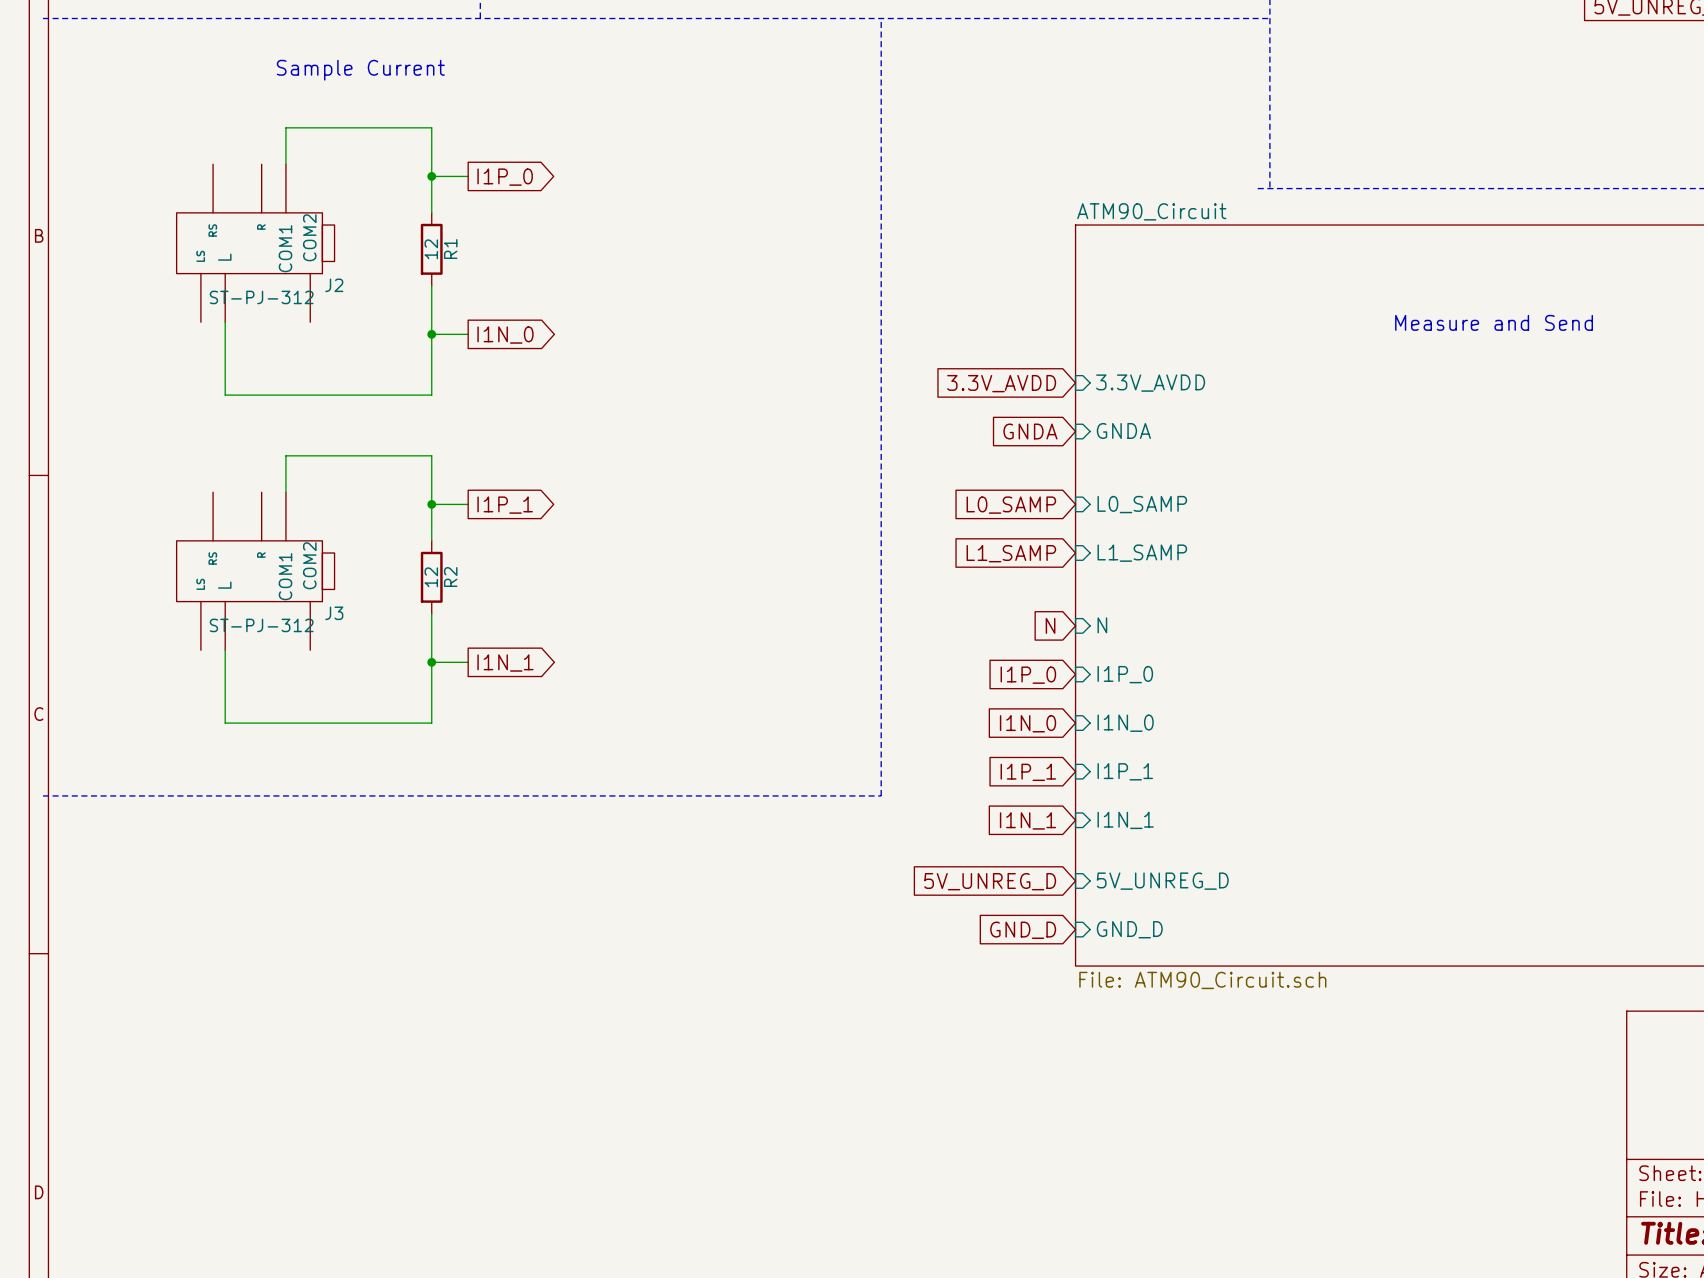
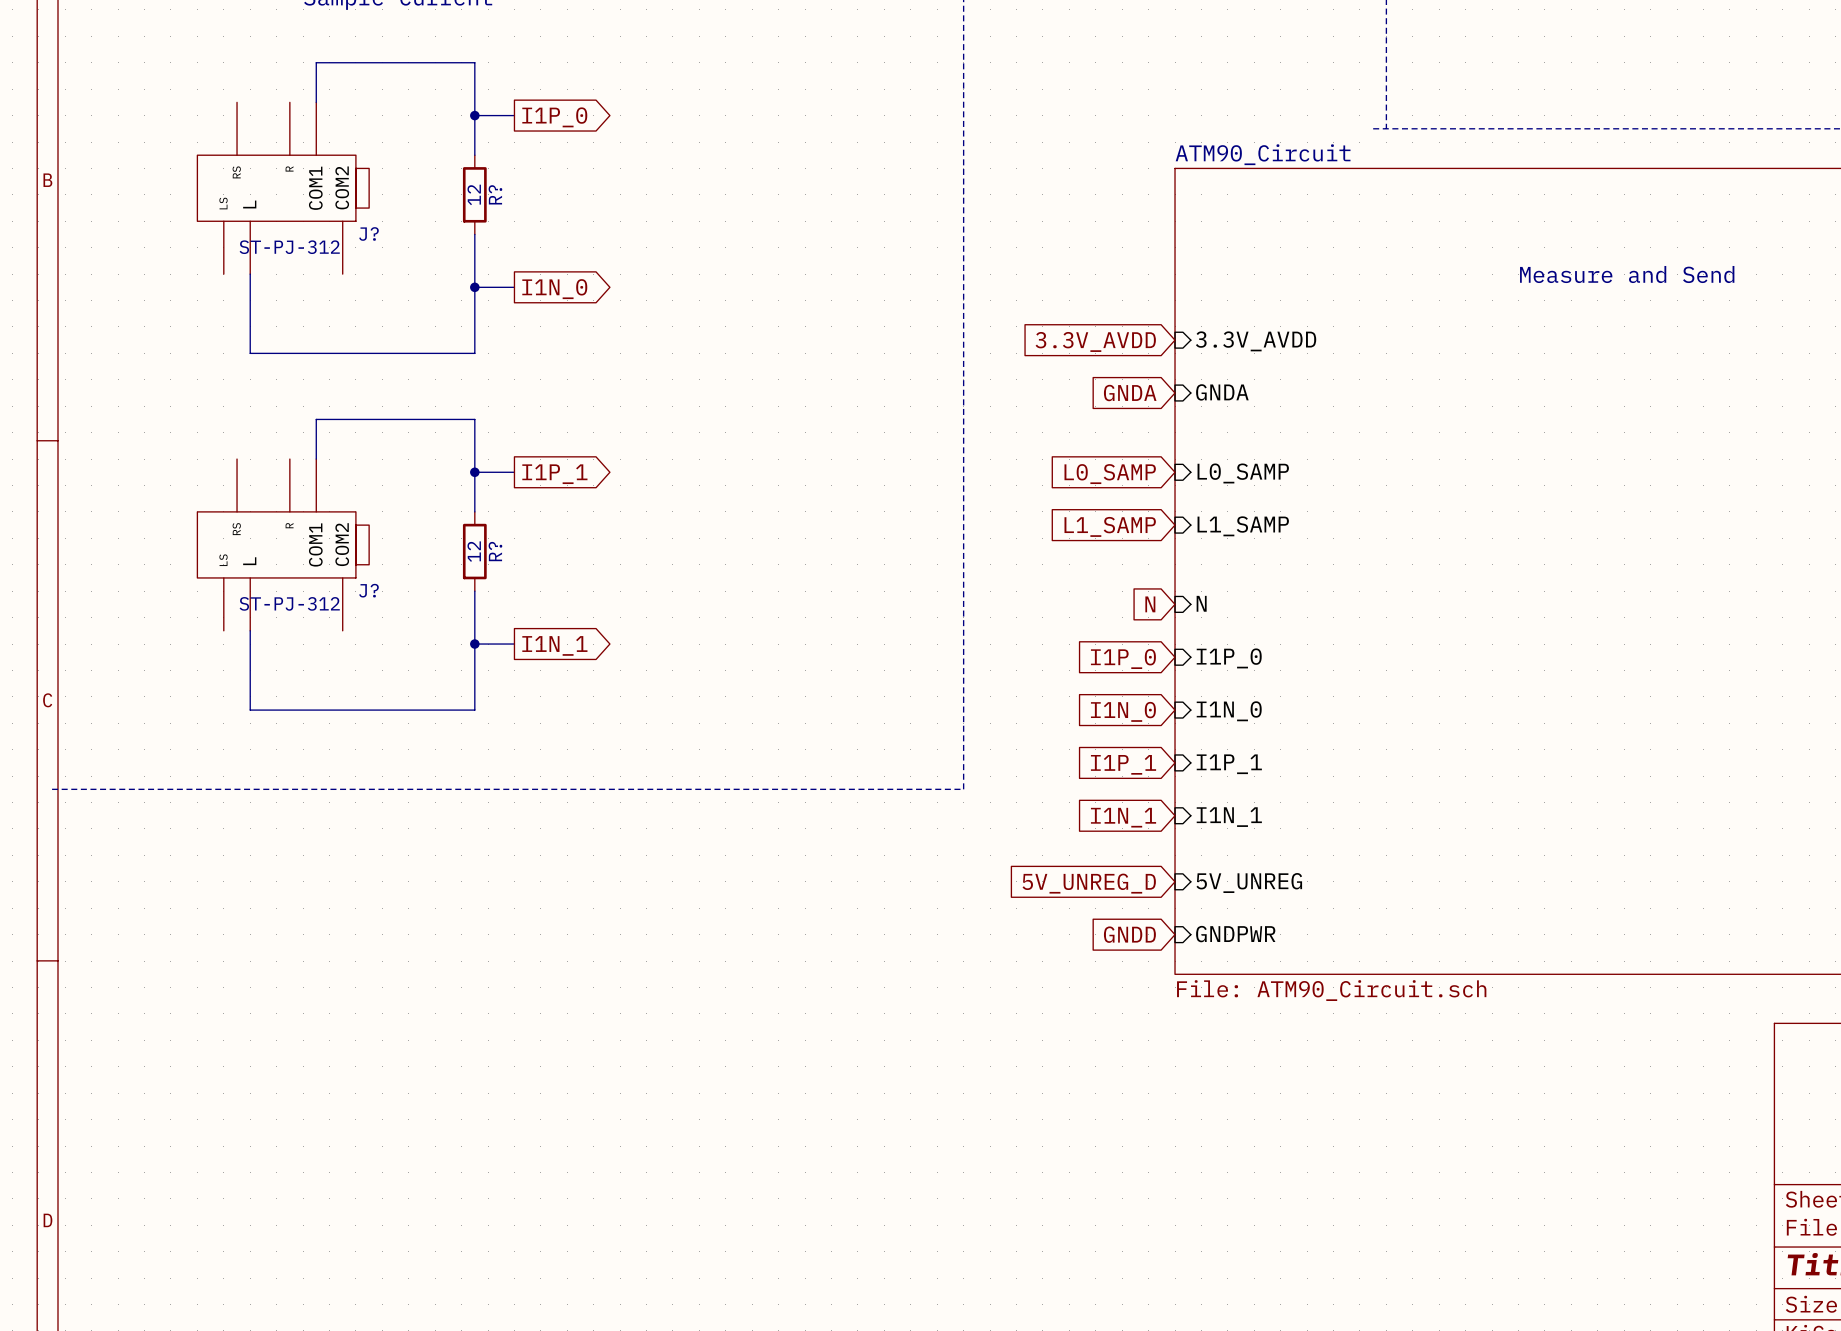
R1 name: R1 (450, 249) -> R? (495, 194)
J2 name: J2 (334, 285) -> J? (368, 233)
R2 name: R2 (450, 577) -> R? (495, 551)
J3 name: J3 (334, 613) -> J? (368, 590)
sheet pin: 5V_UNREG_D (1162, 881) -> 5V_UNREG (1249, 883)
sheet pin: GND_D (1129, 929) -> GNDPWR (1235, 934)
global label: GND_D (1023, 930) -> GNDD (1129, 934)

